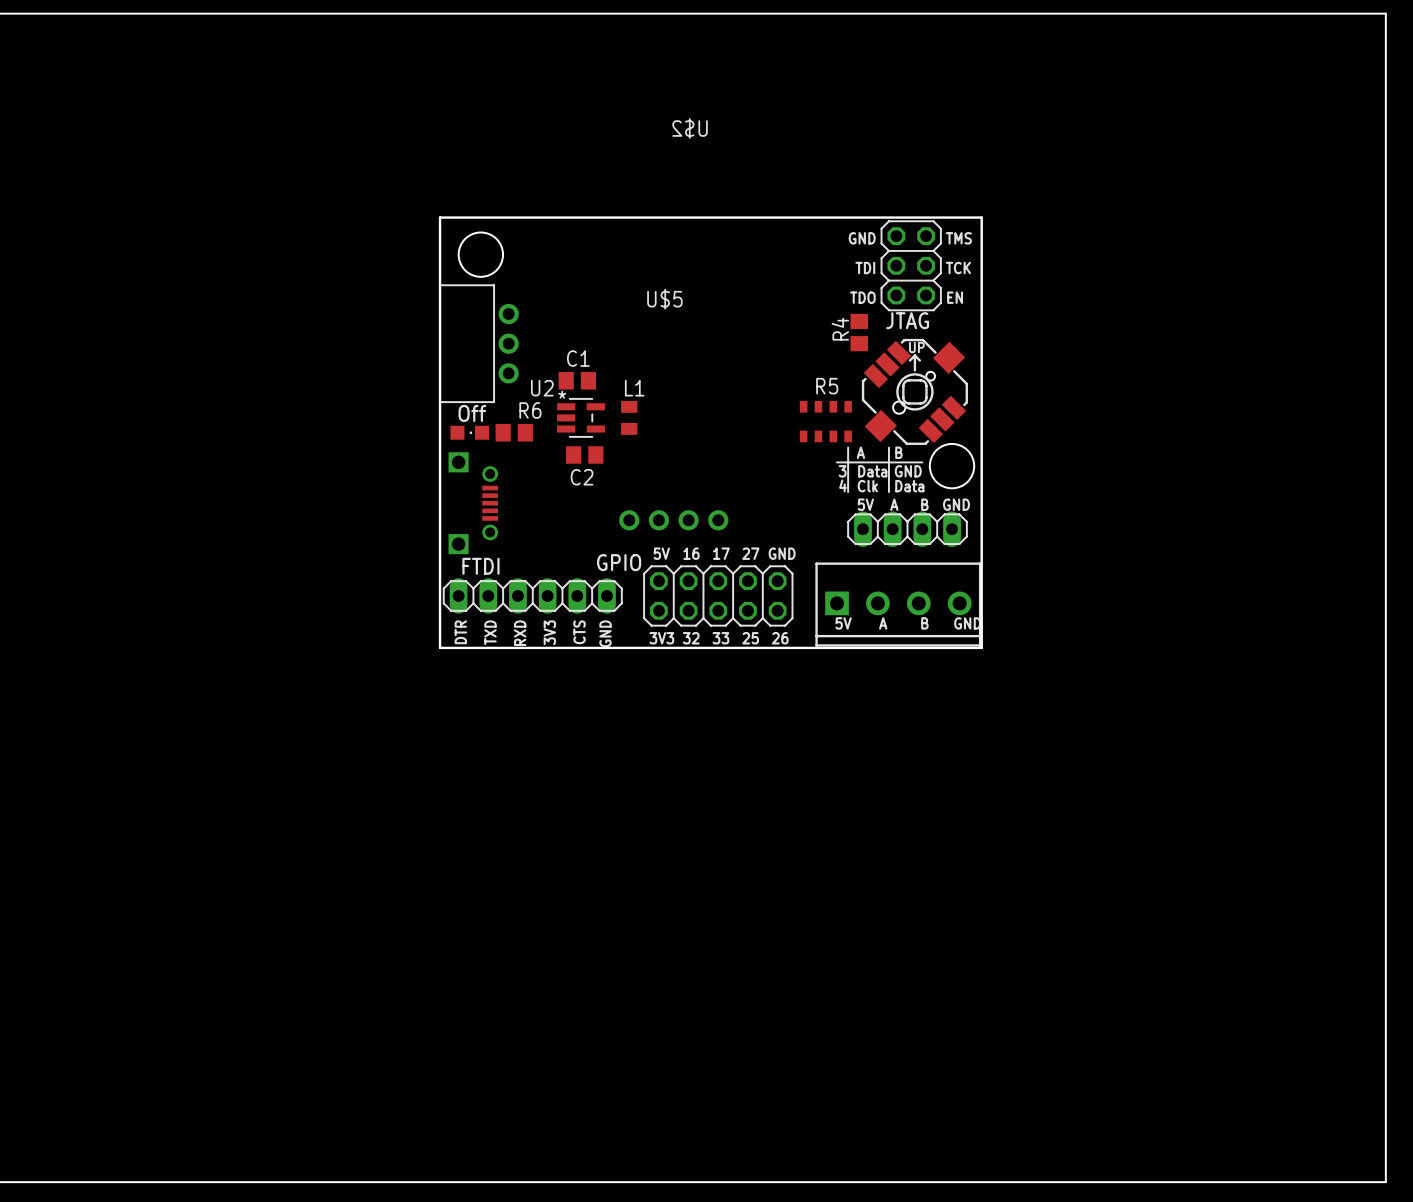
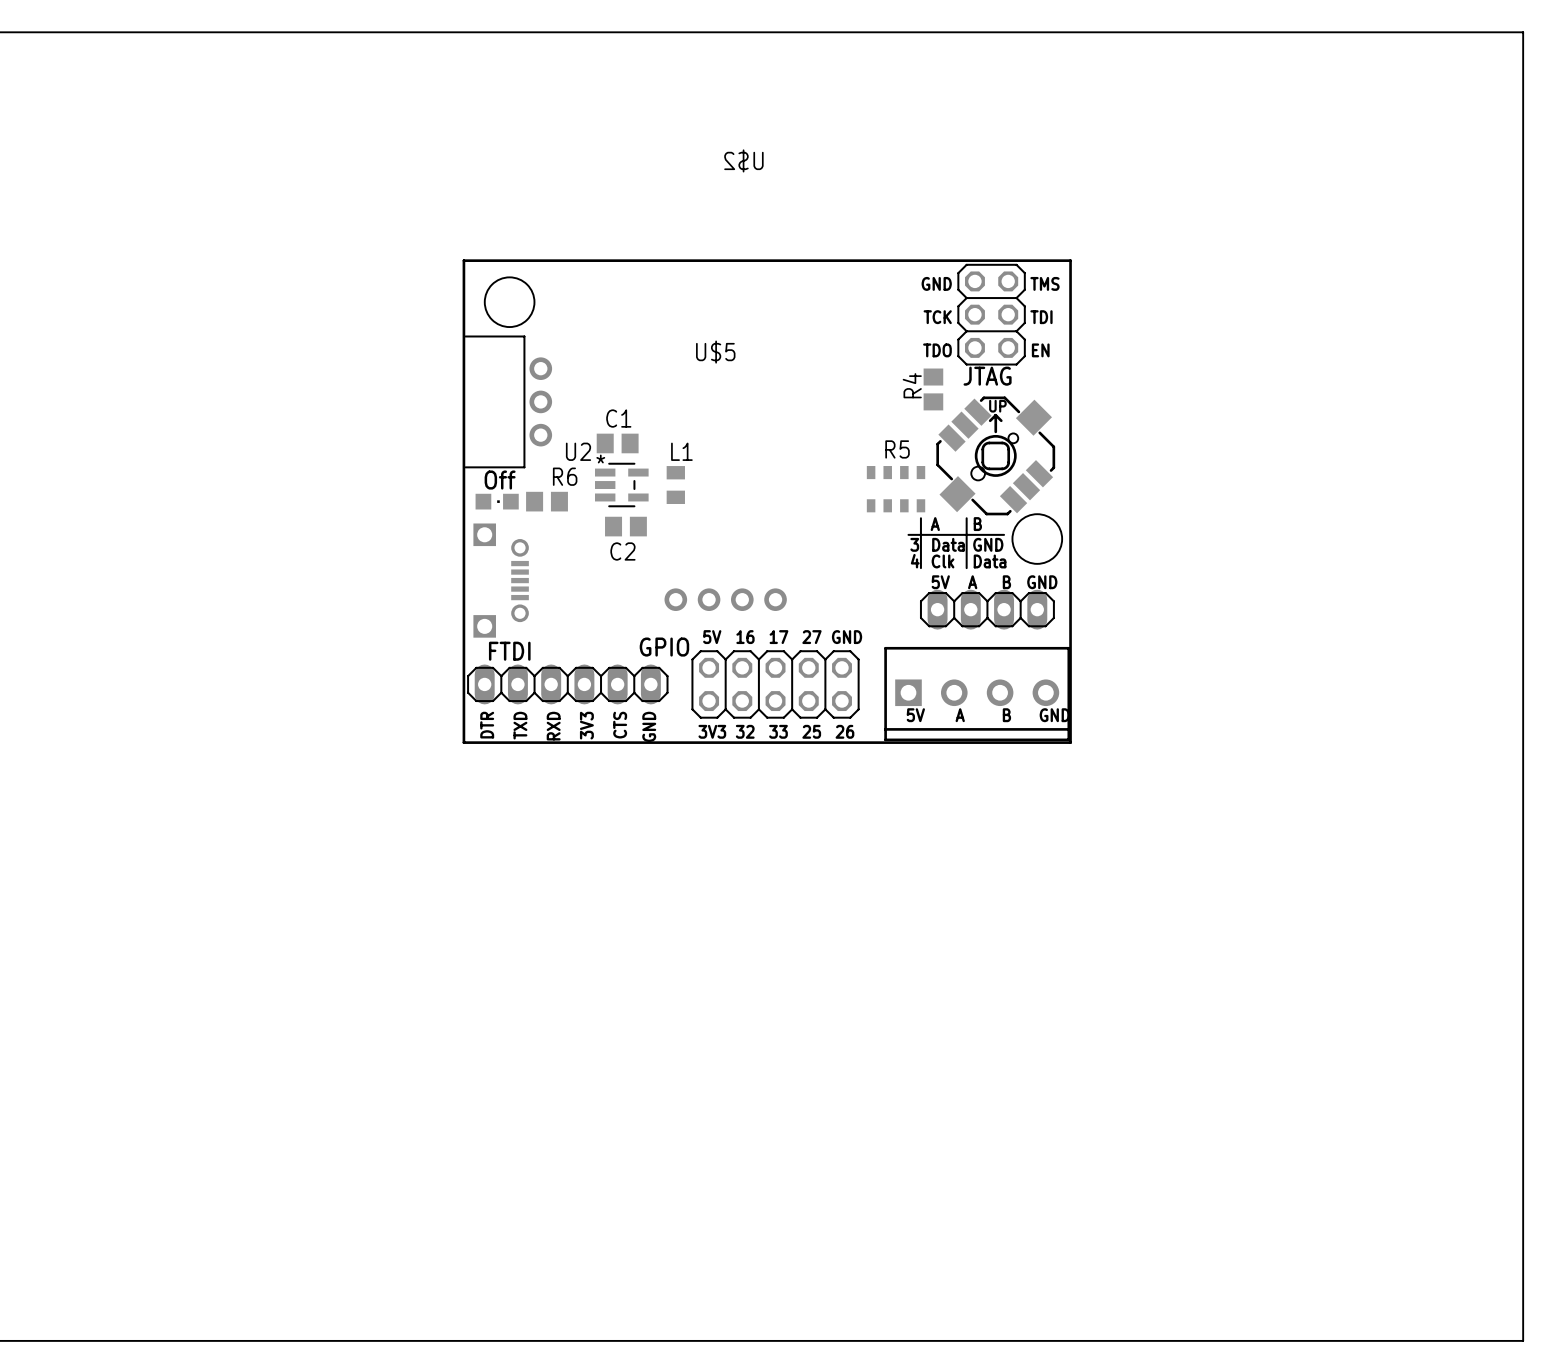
text: TDI (865, 268) -> TCK (937, 317)
text: TCK (958, 268) -> TDI (1041, 317)

